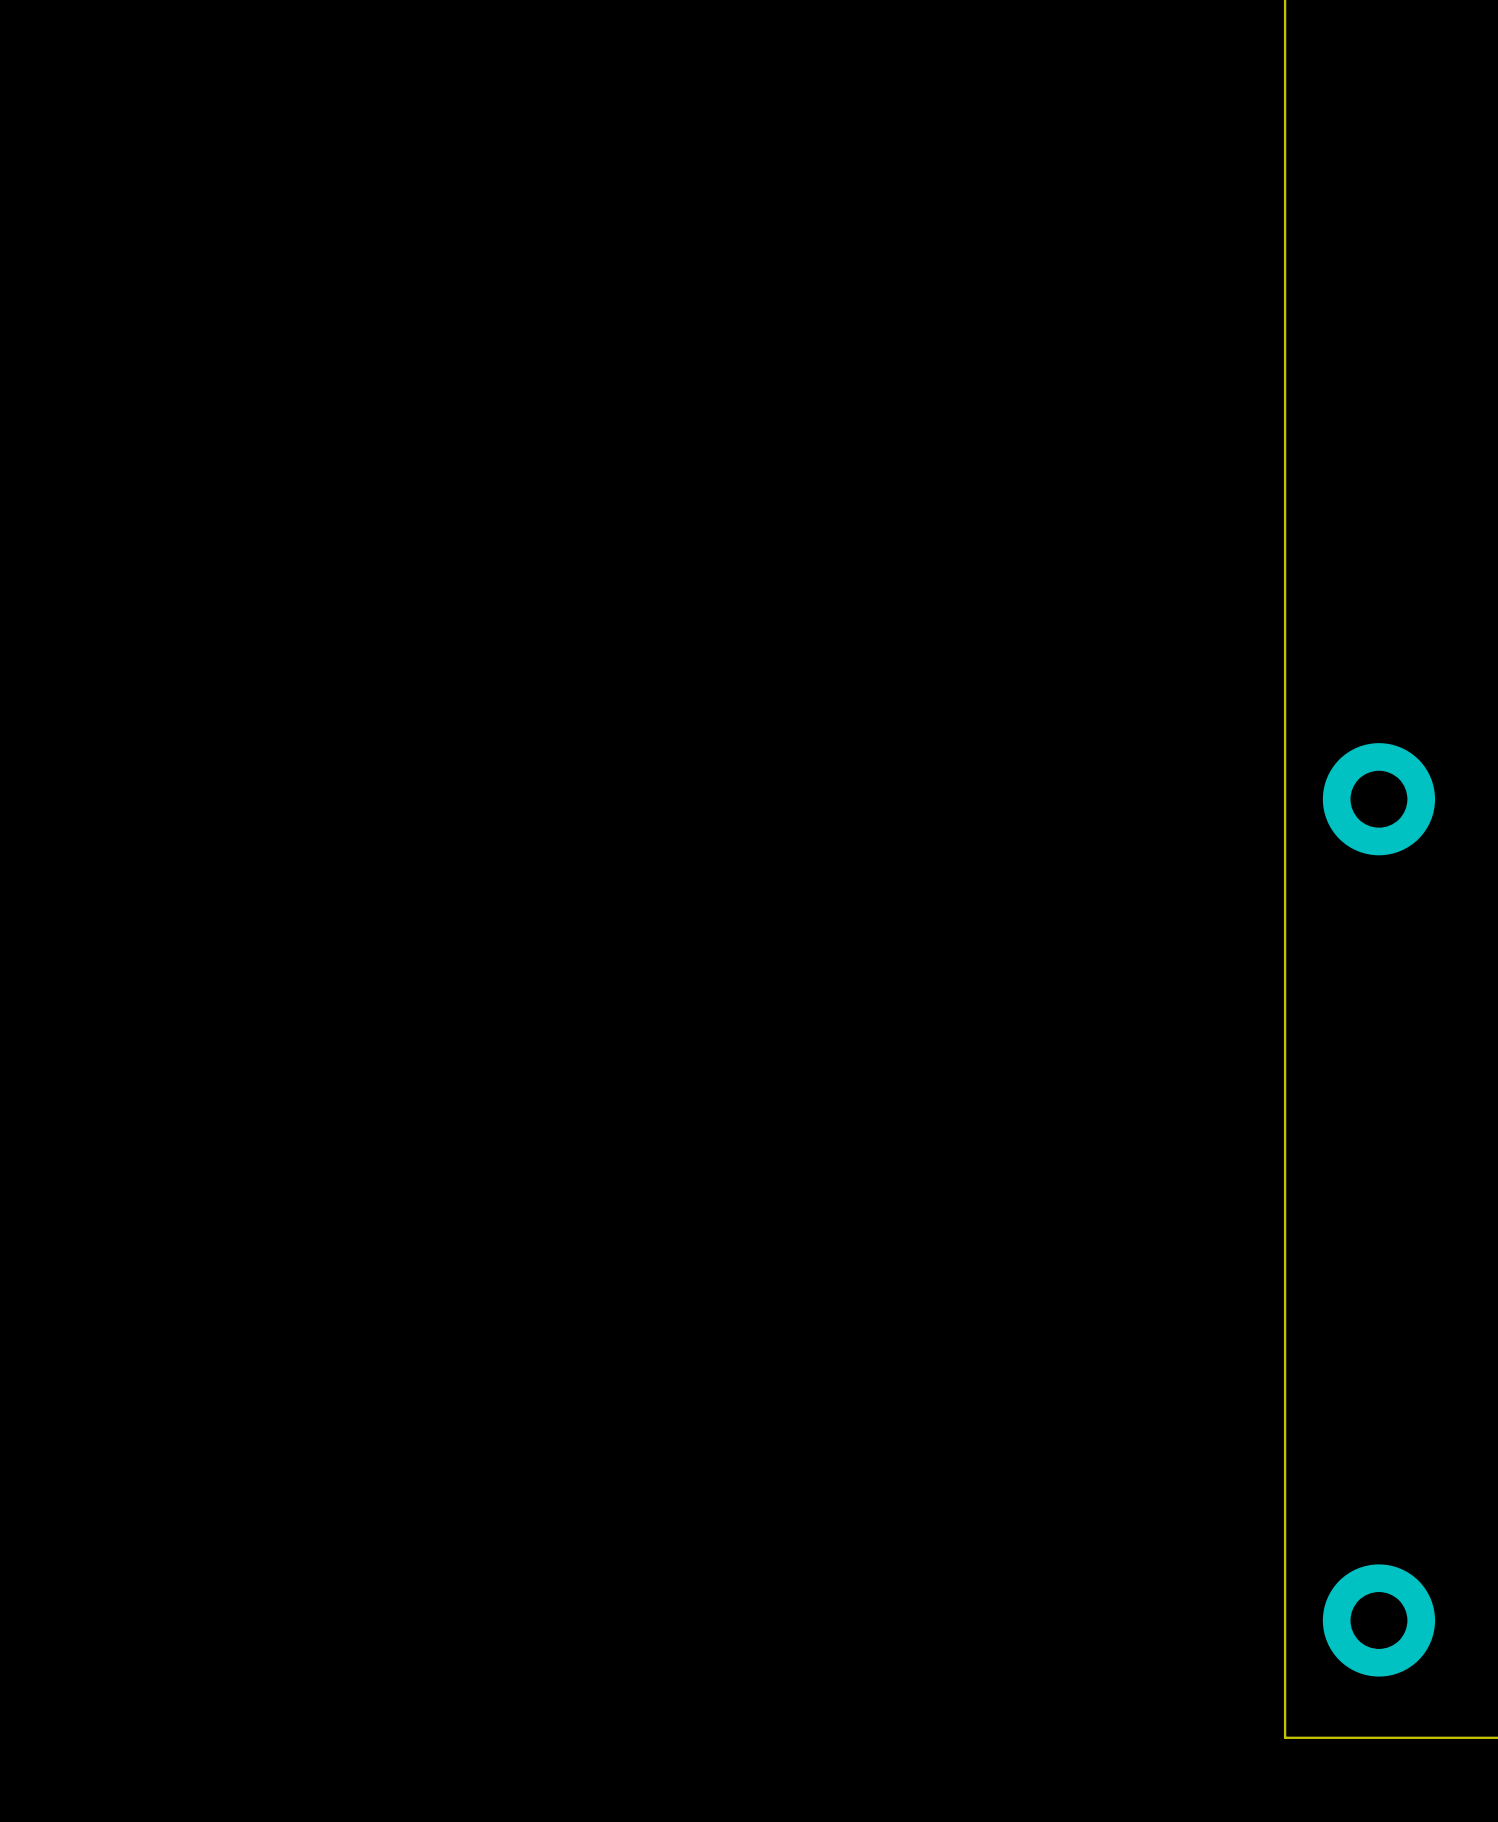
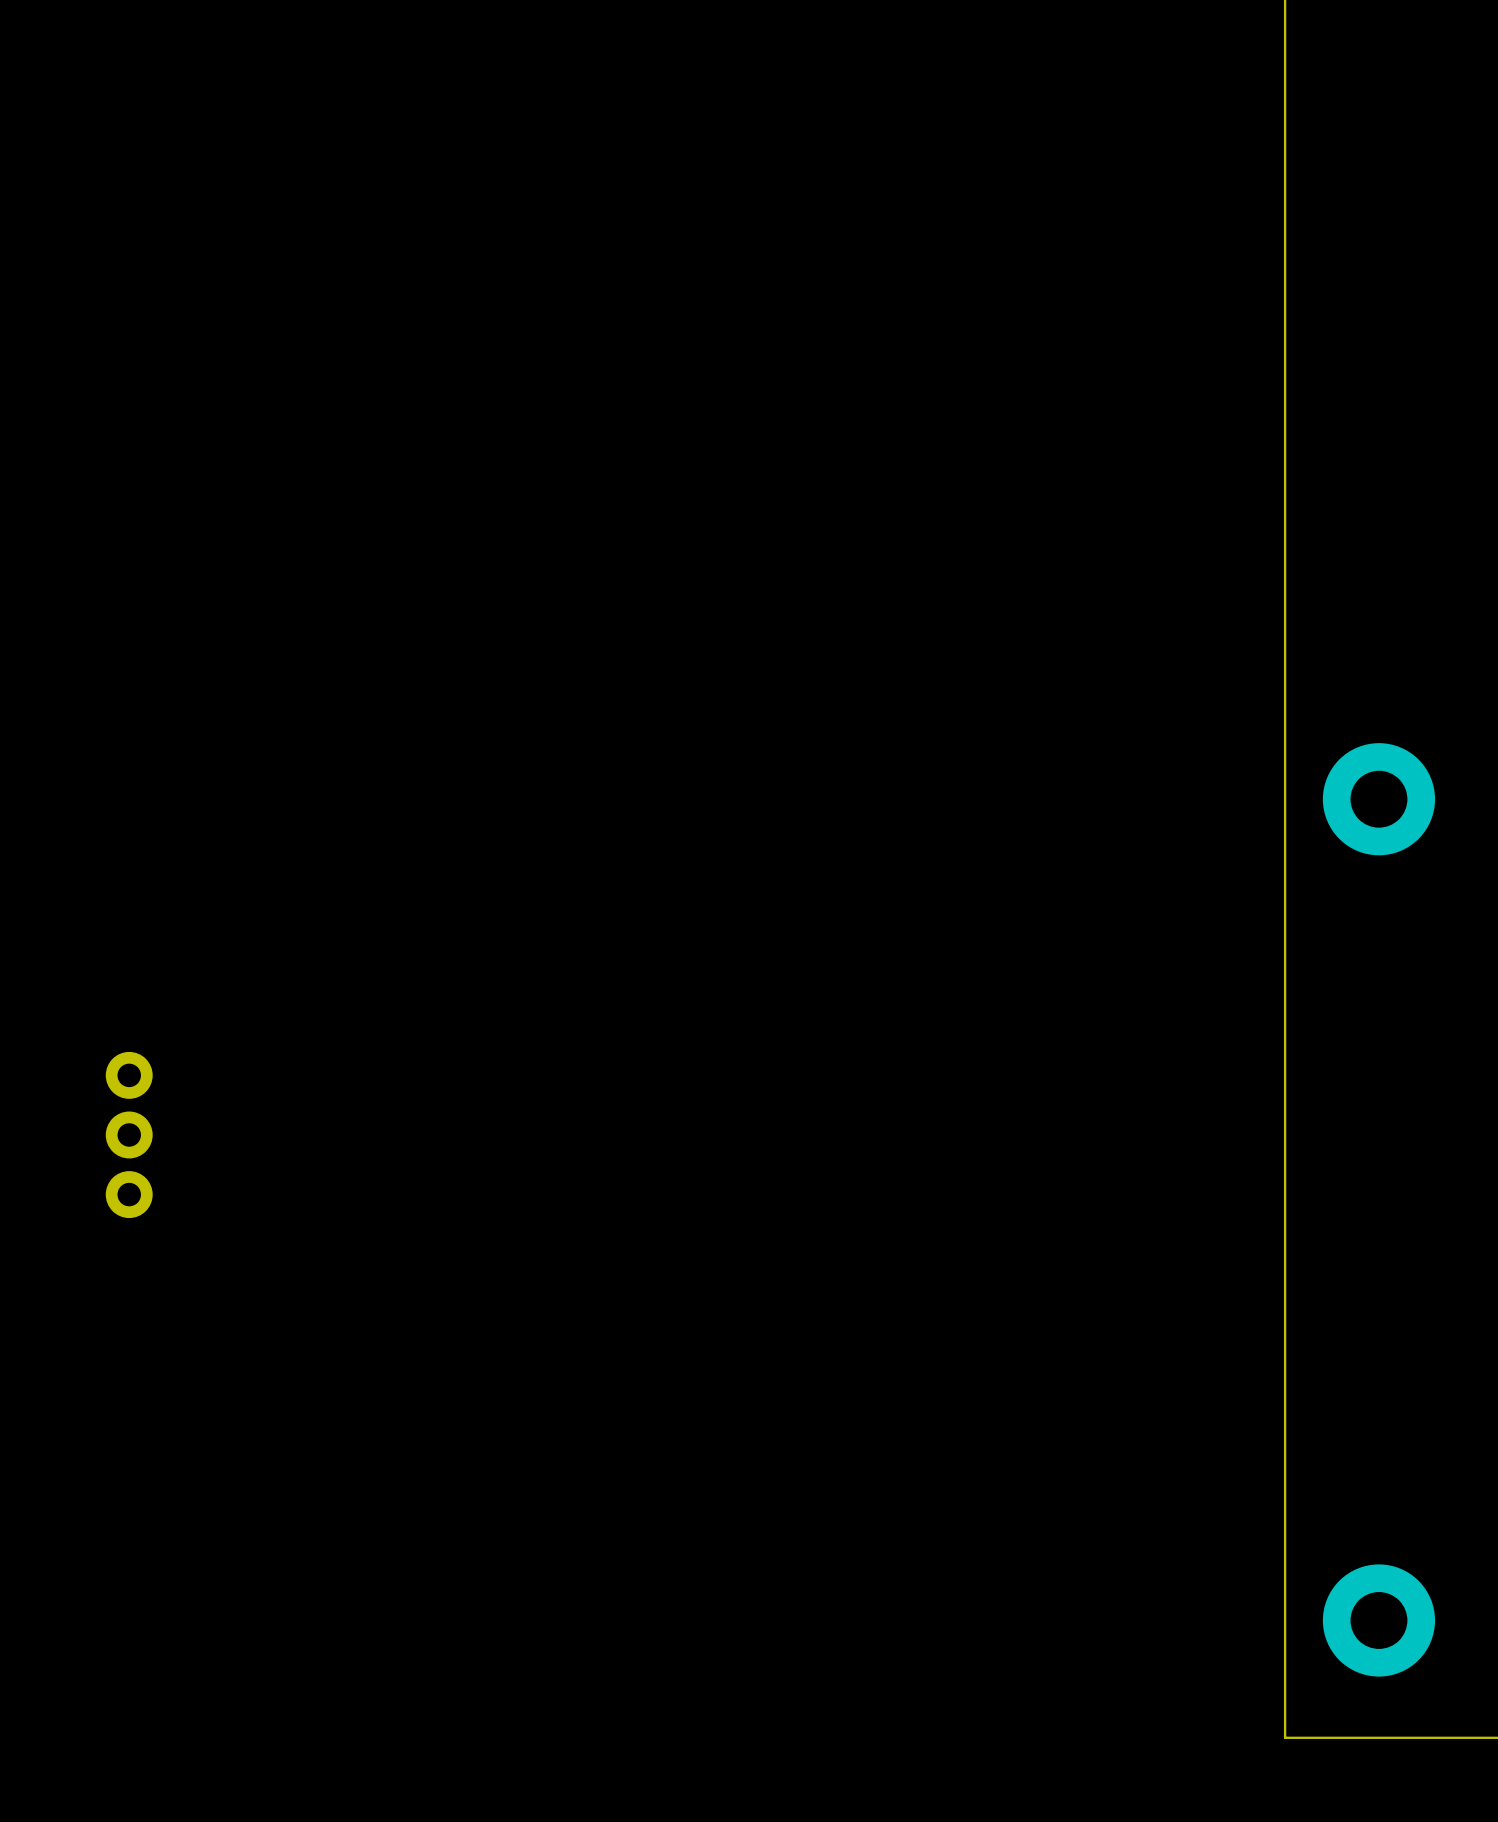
part: none -> (129, 1134)

